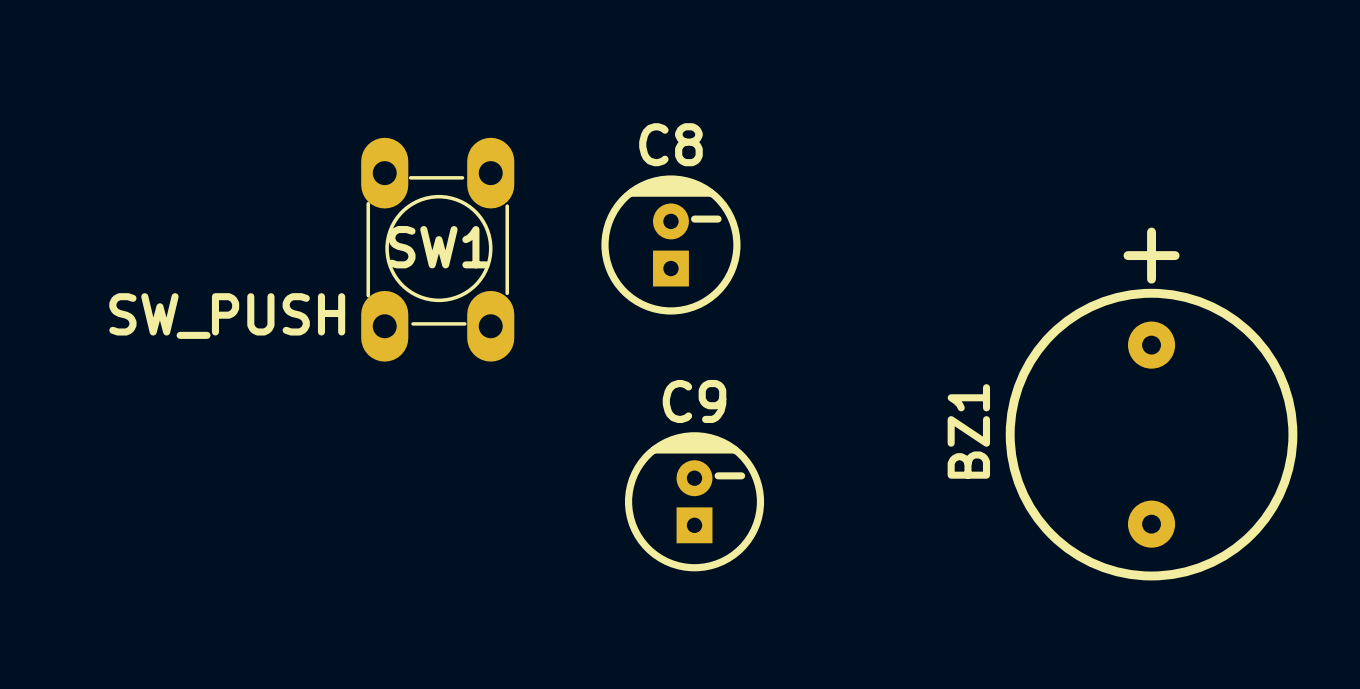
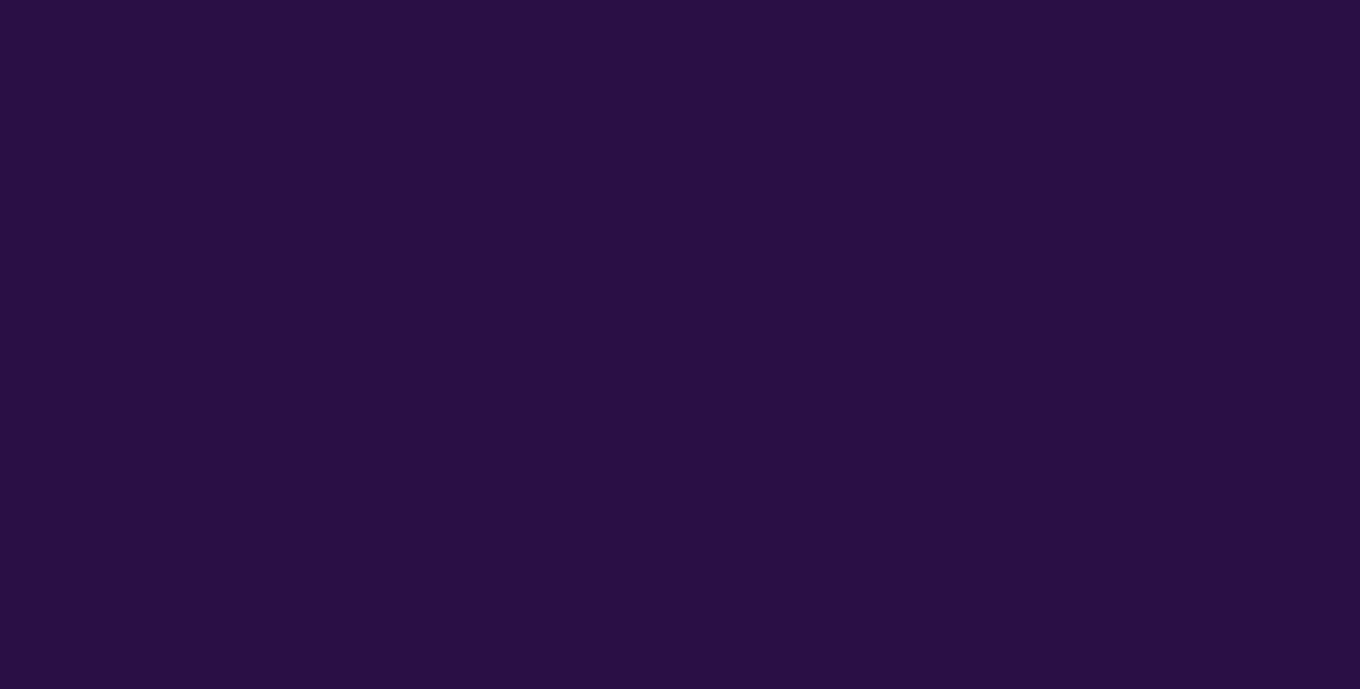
C8: (670, 244) -> none
SW1: SW_PUSH (437, 249) -> none
BZ1: (1151, 404) -> none
C9: (694, 501) -> none

